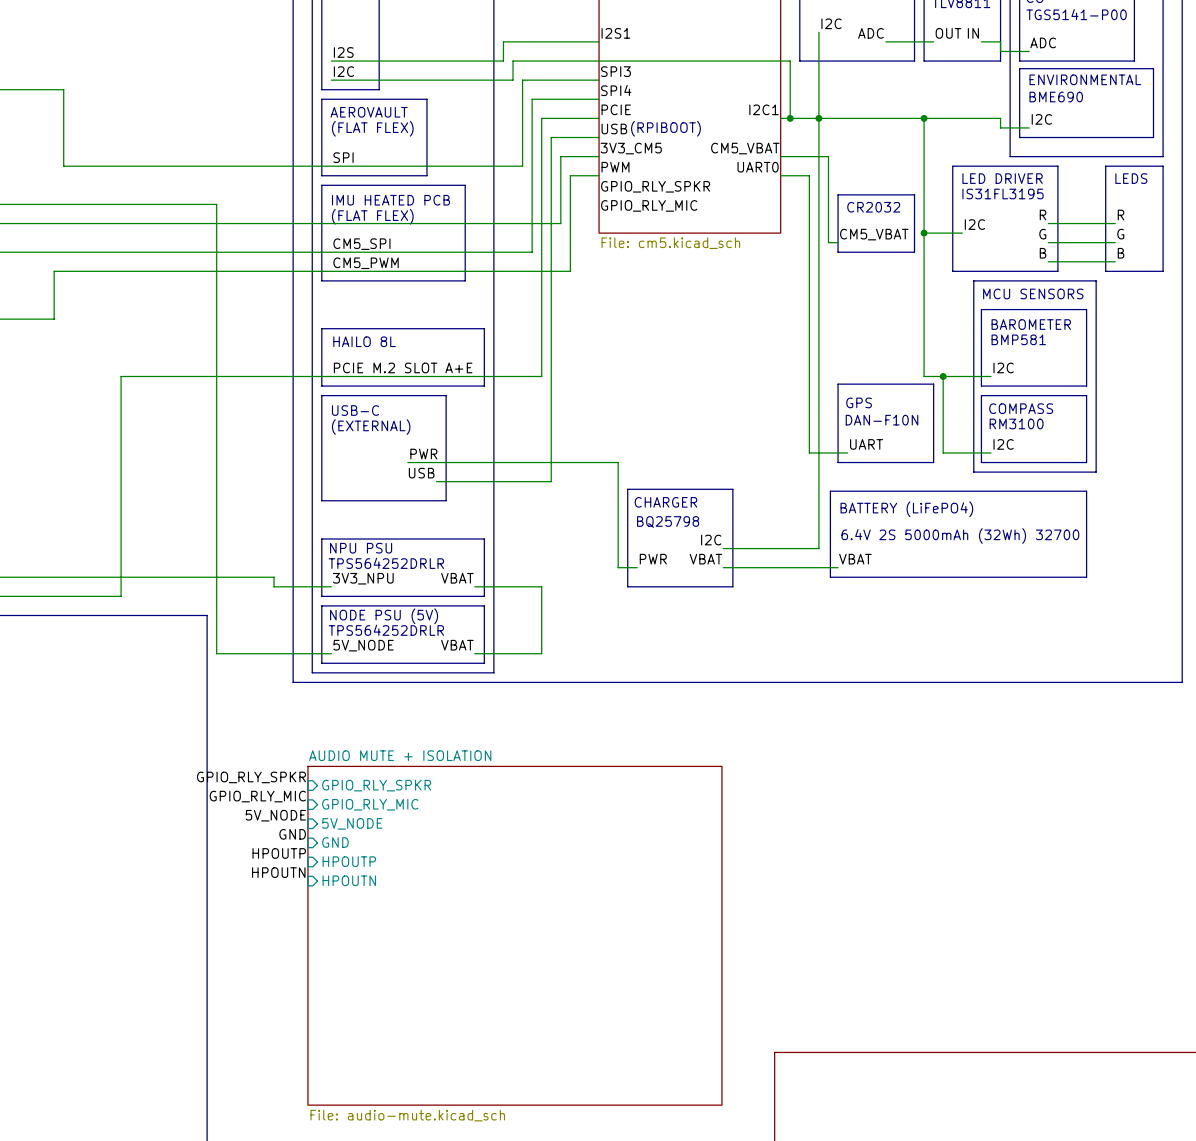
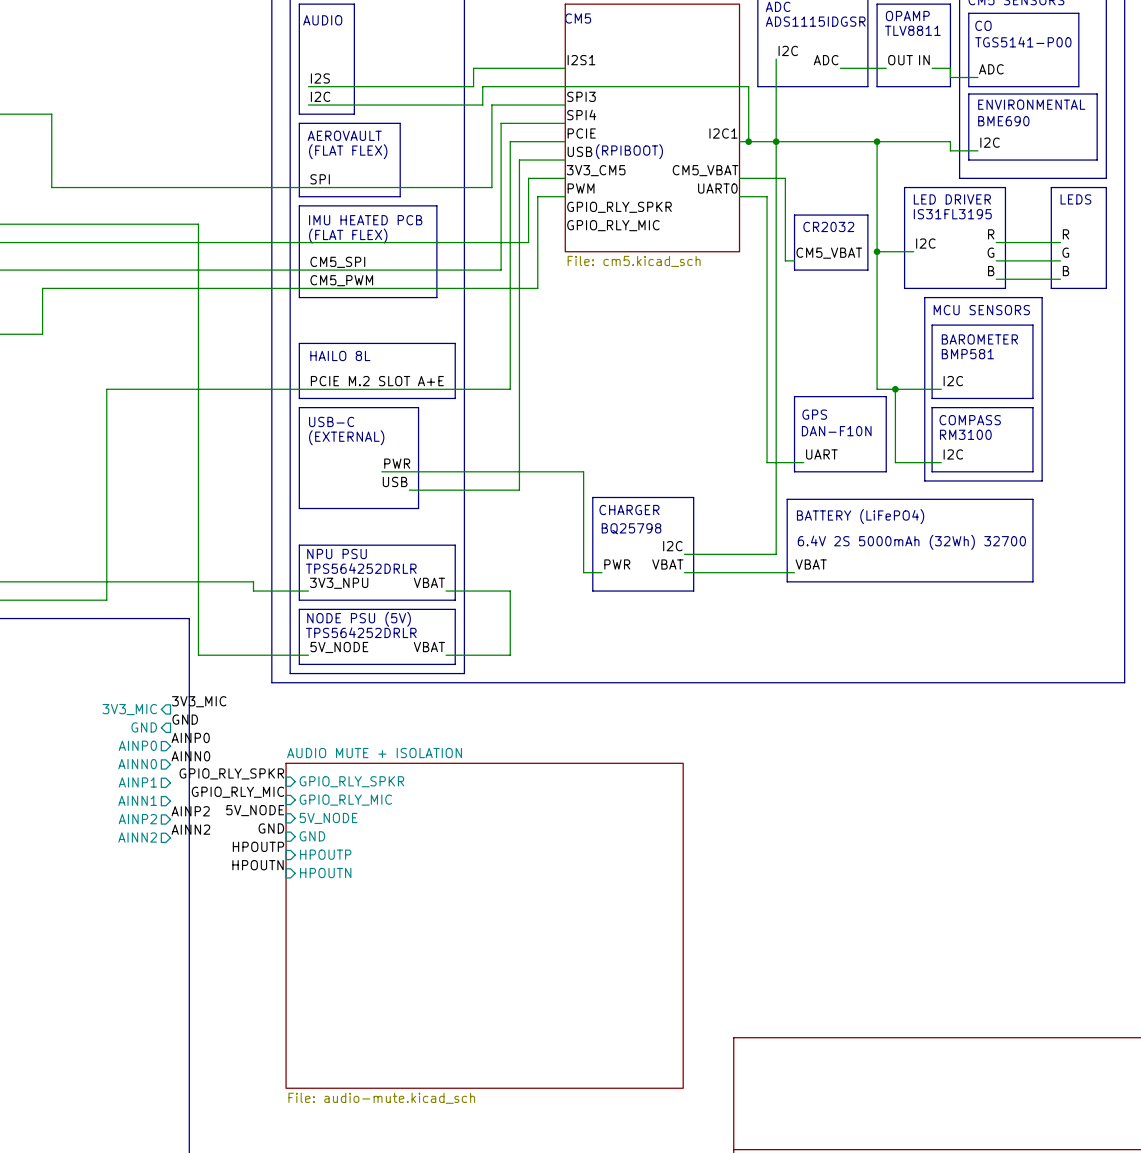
label: none -> 3V3_MIC (199, 701)
sheet pin: none -> 3V3_MIC (129, 709)
label: none -> GND (185, 719)
sheet pin: none -> GND (144, 727)
label: none -> AINP0 (190, 737)
sheet pin: none -> AINP0 (137, 745)
label: none -> AINN0 (190, 756)
sheet pin: none -> AINN0 (137, 764)
sheet pin: none -> AINP1 (137, 782)
sheet pin: none -> AINN1 (137, 800)
label: none -> AINP2 (190, 811)
sheet pin: none -> AINP2 (137, 819)
label: none -> AINN2 (190, 829)
sheet pin: none -> AINN2 (137, 837)

